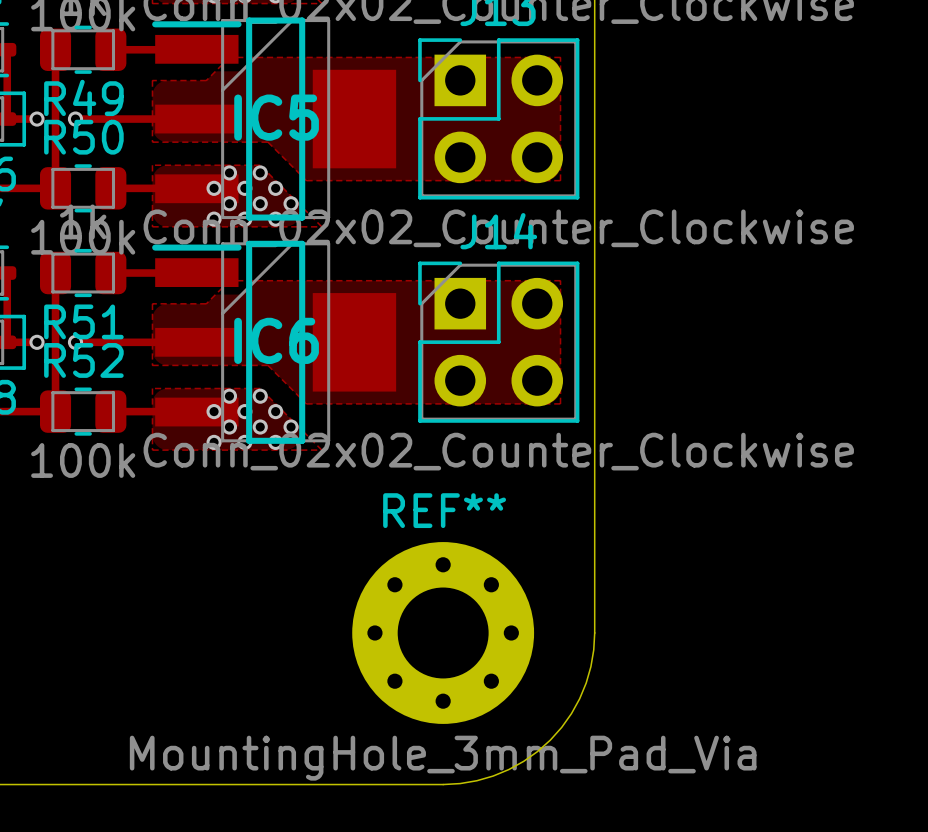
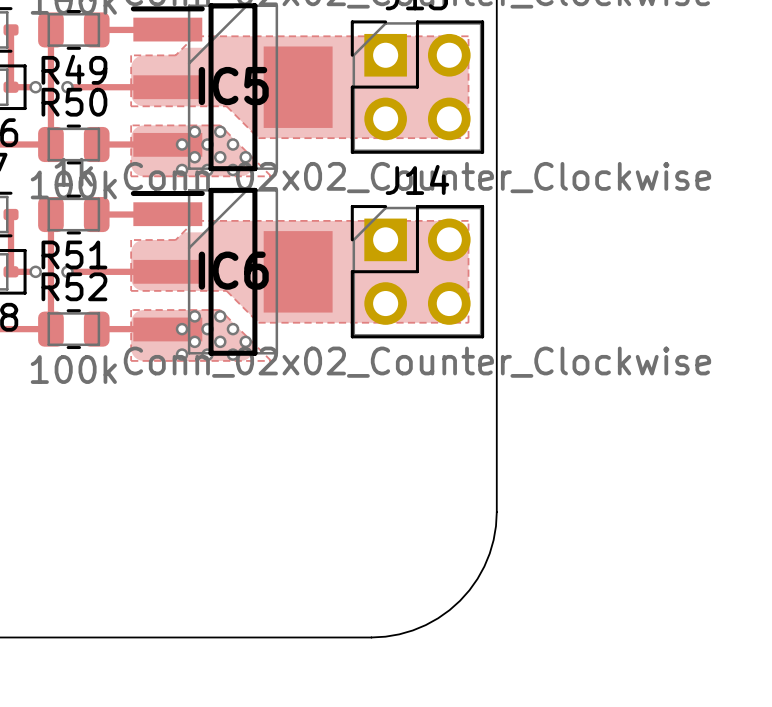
REF**: MountingHole_3mm_Pad_Via (443, 632) -> none

